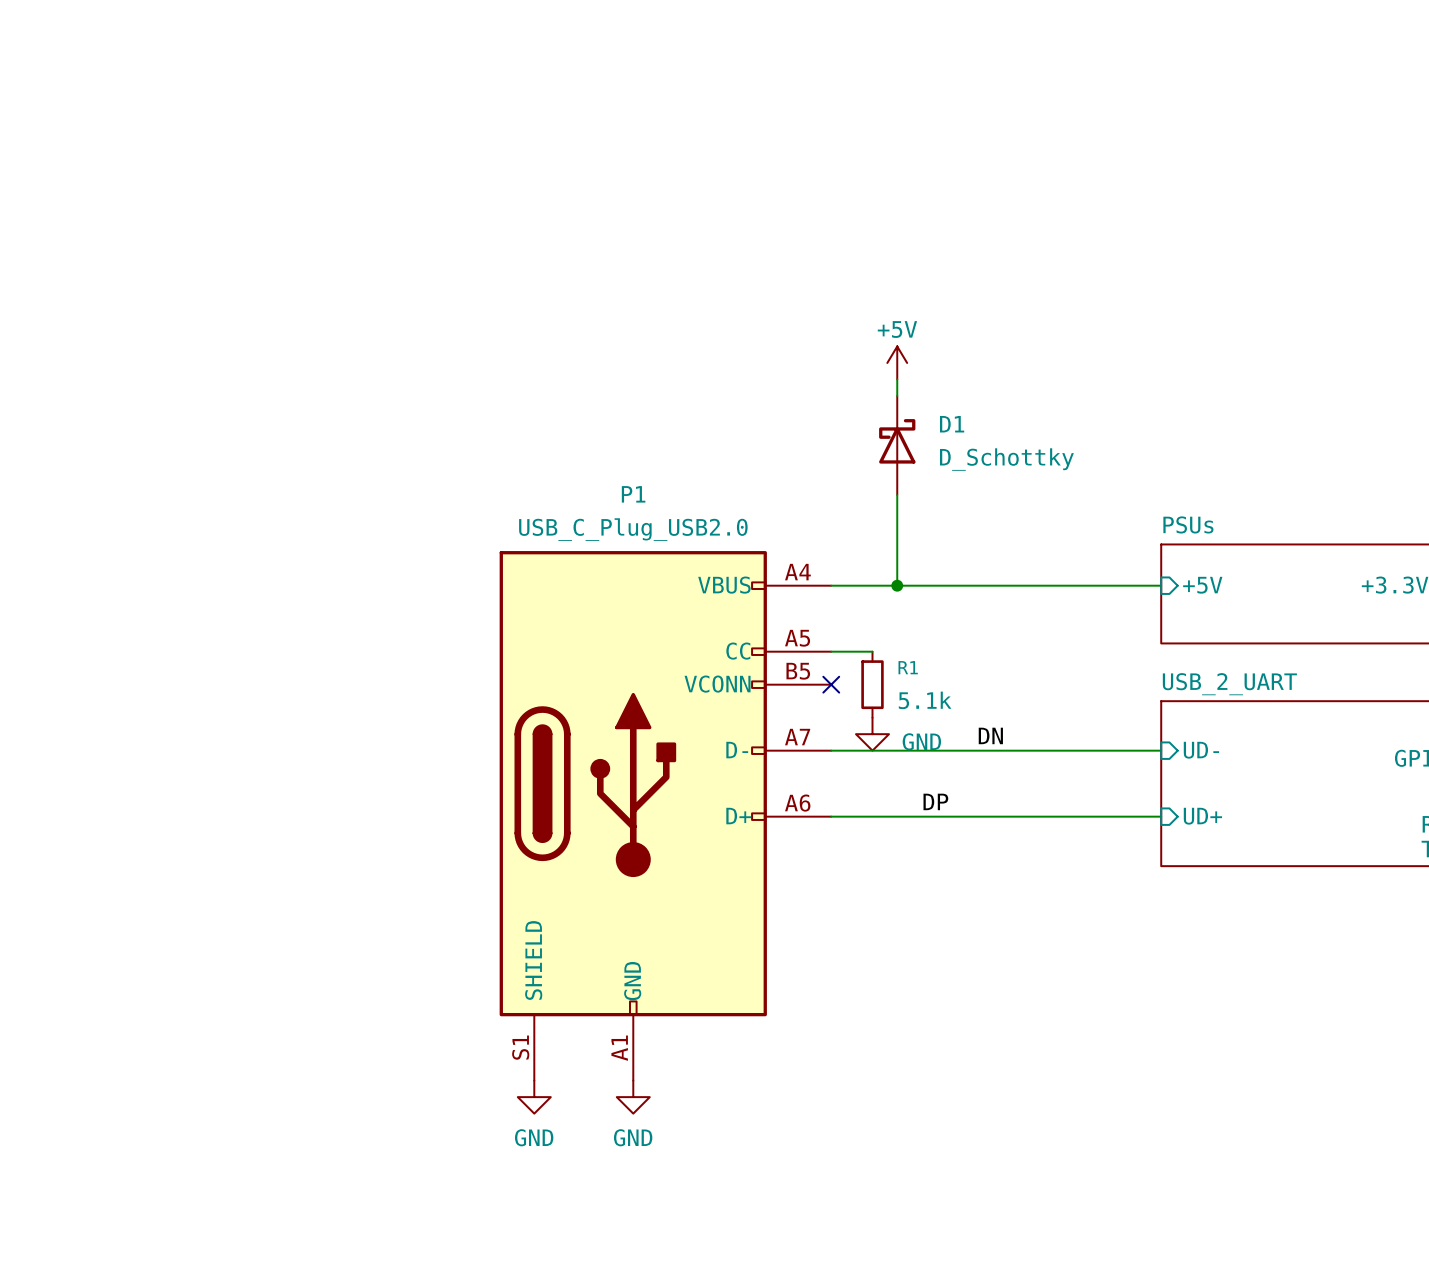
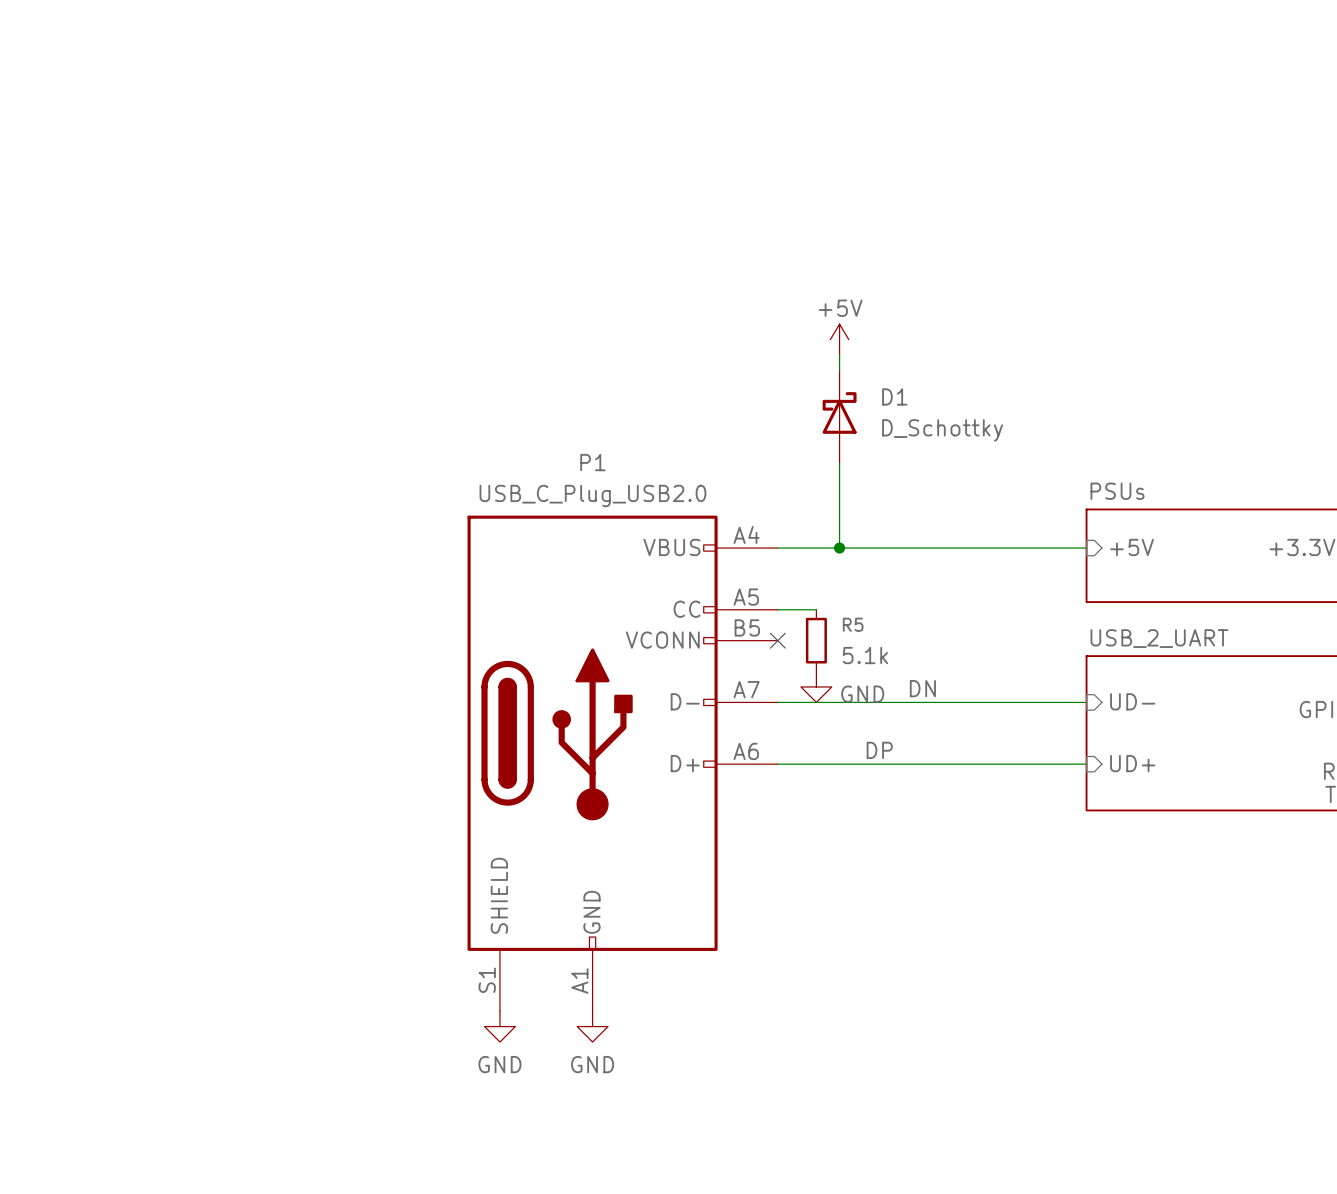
R1 name: R1 (908, 667) -> R5 (853, 624)

